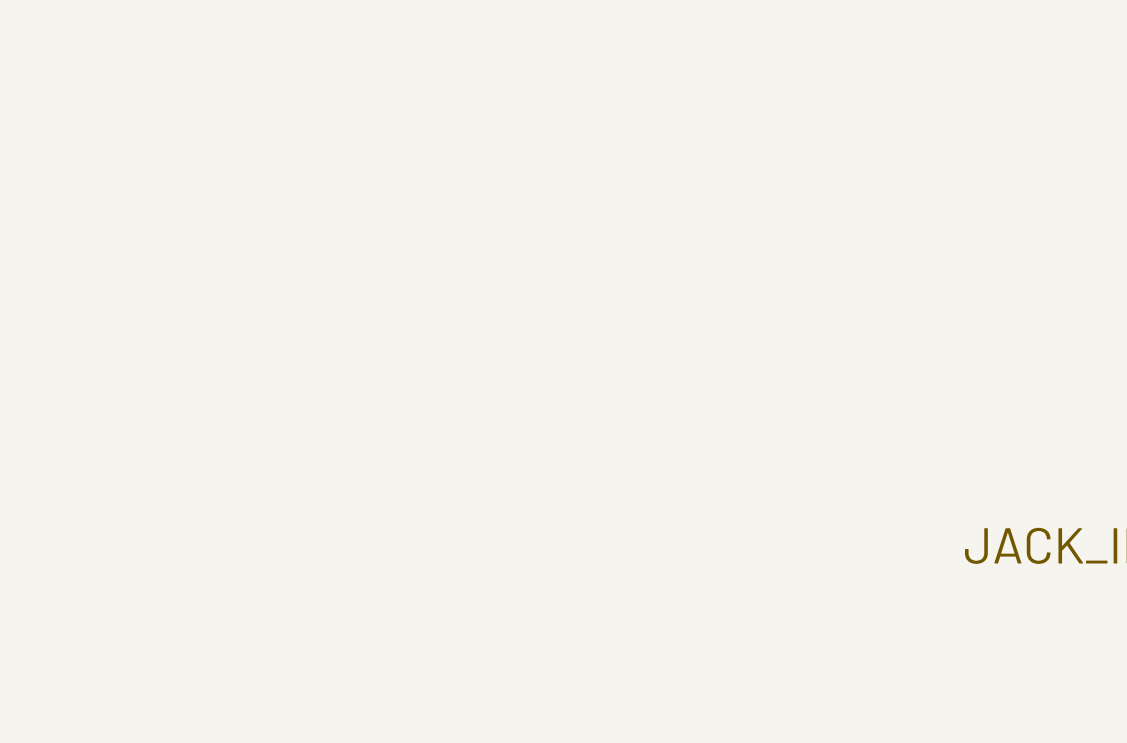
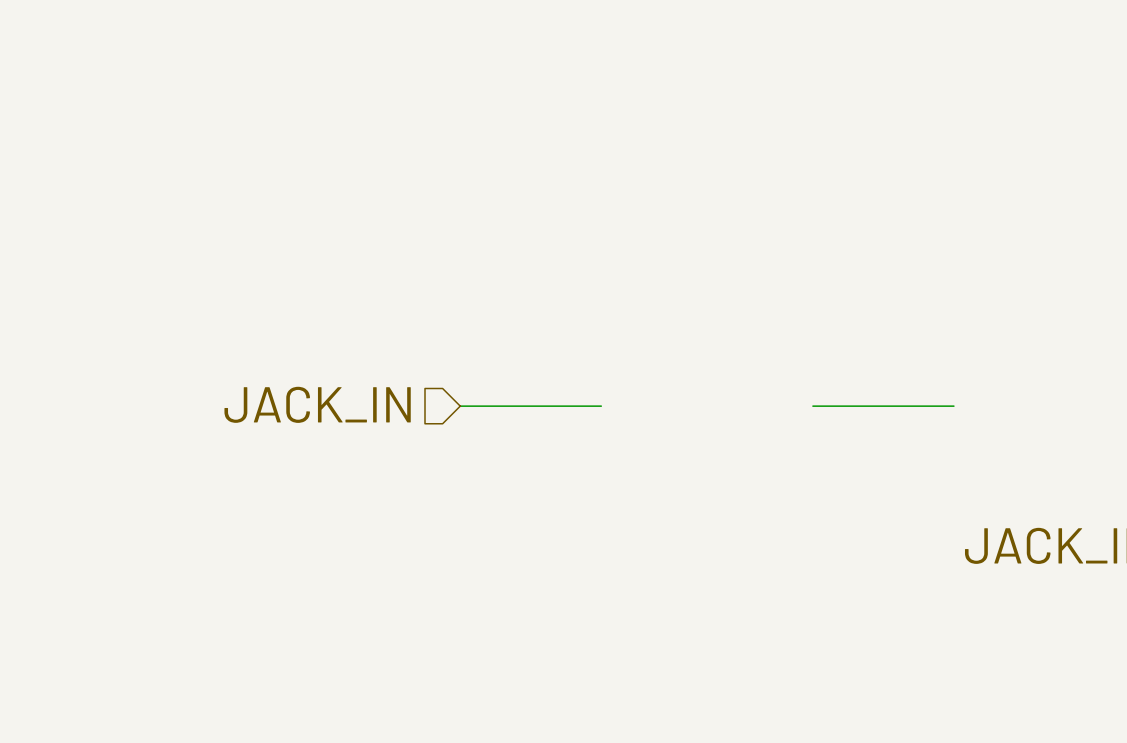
hierarchical label: none -> JACK_IN (317, 404)
wire: none -> (460, 406) (601, 406)
wire: none -> (812, 406) (953, 406)

